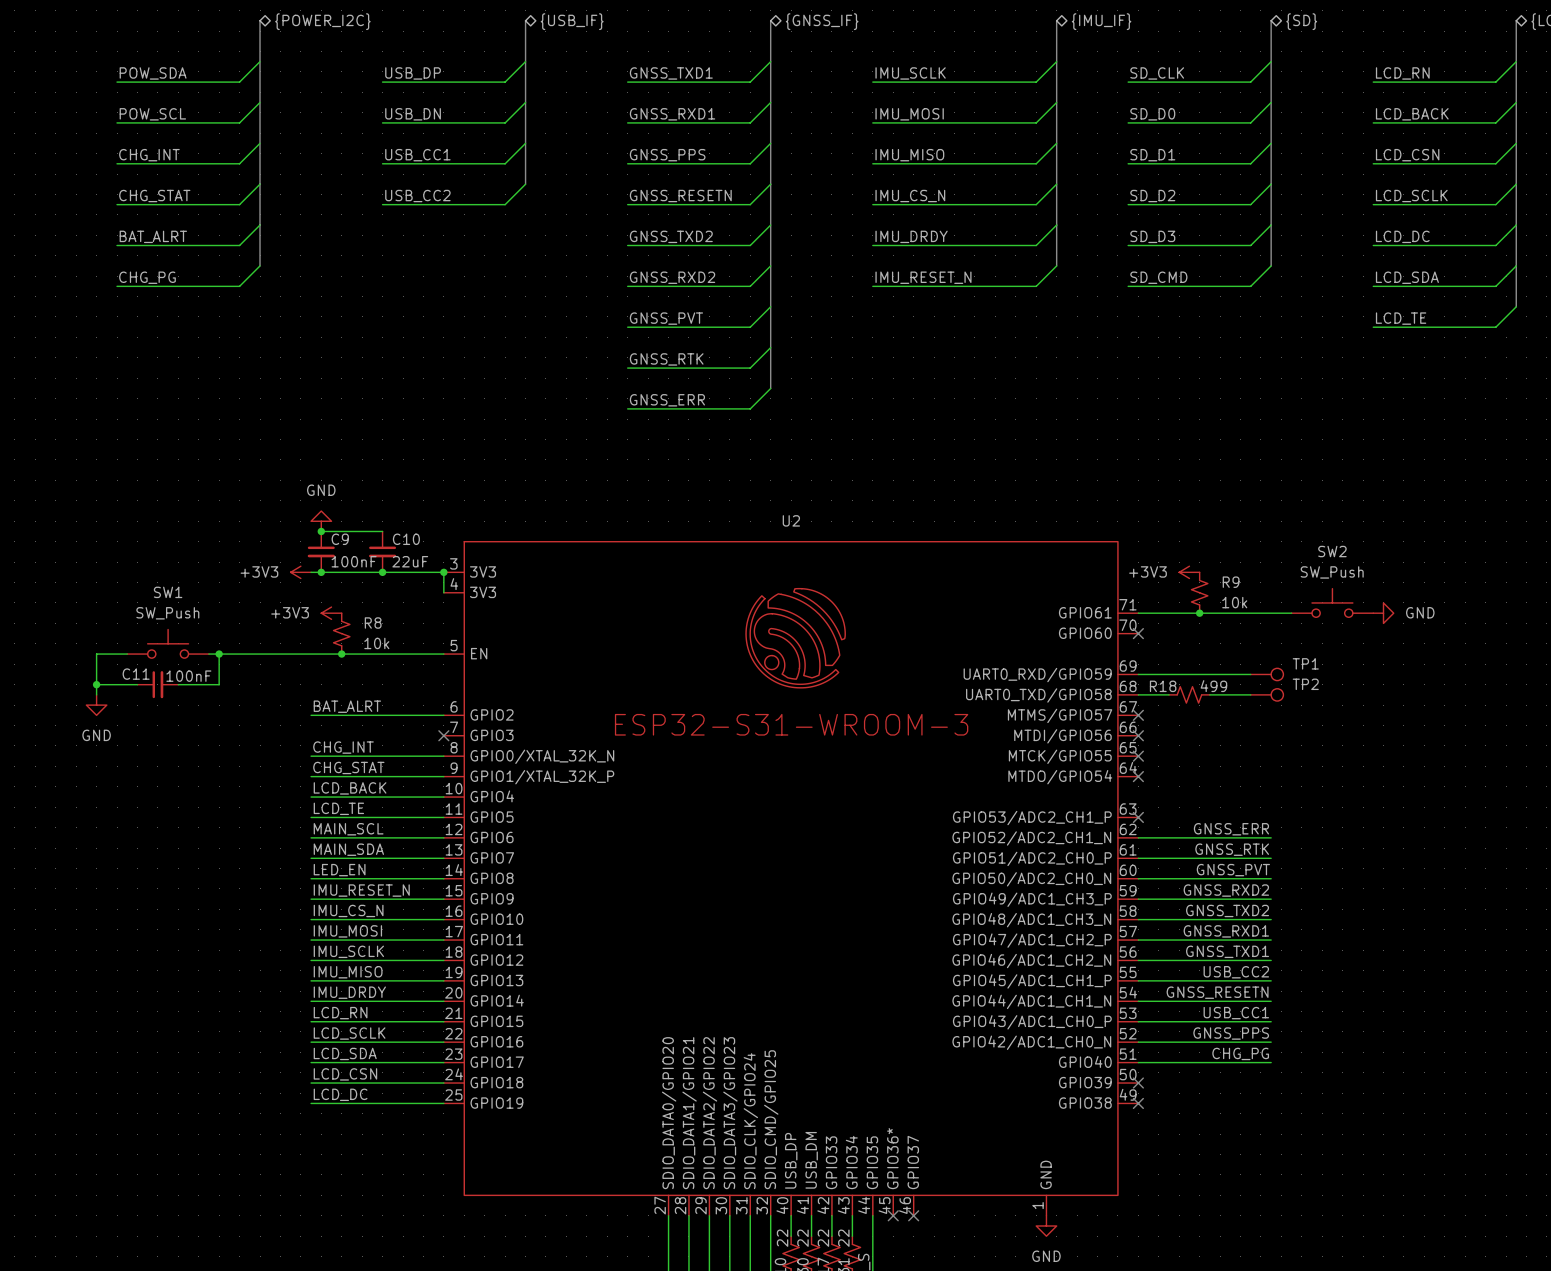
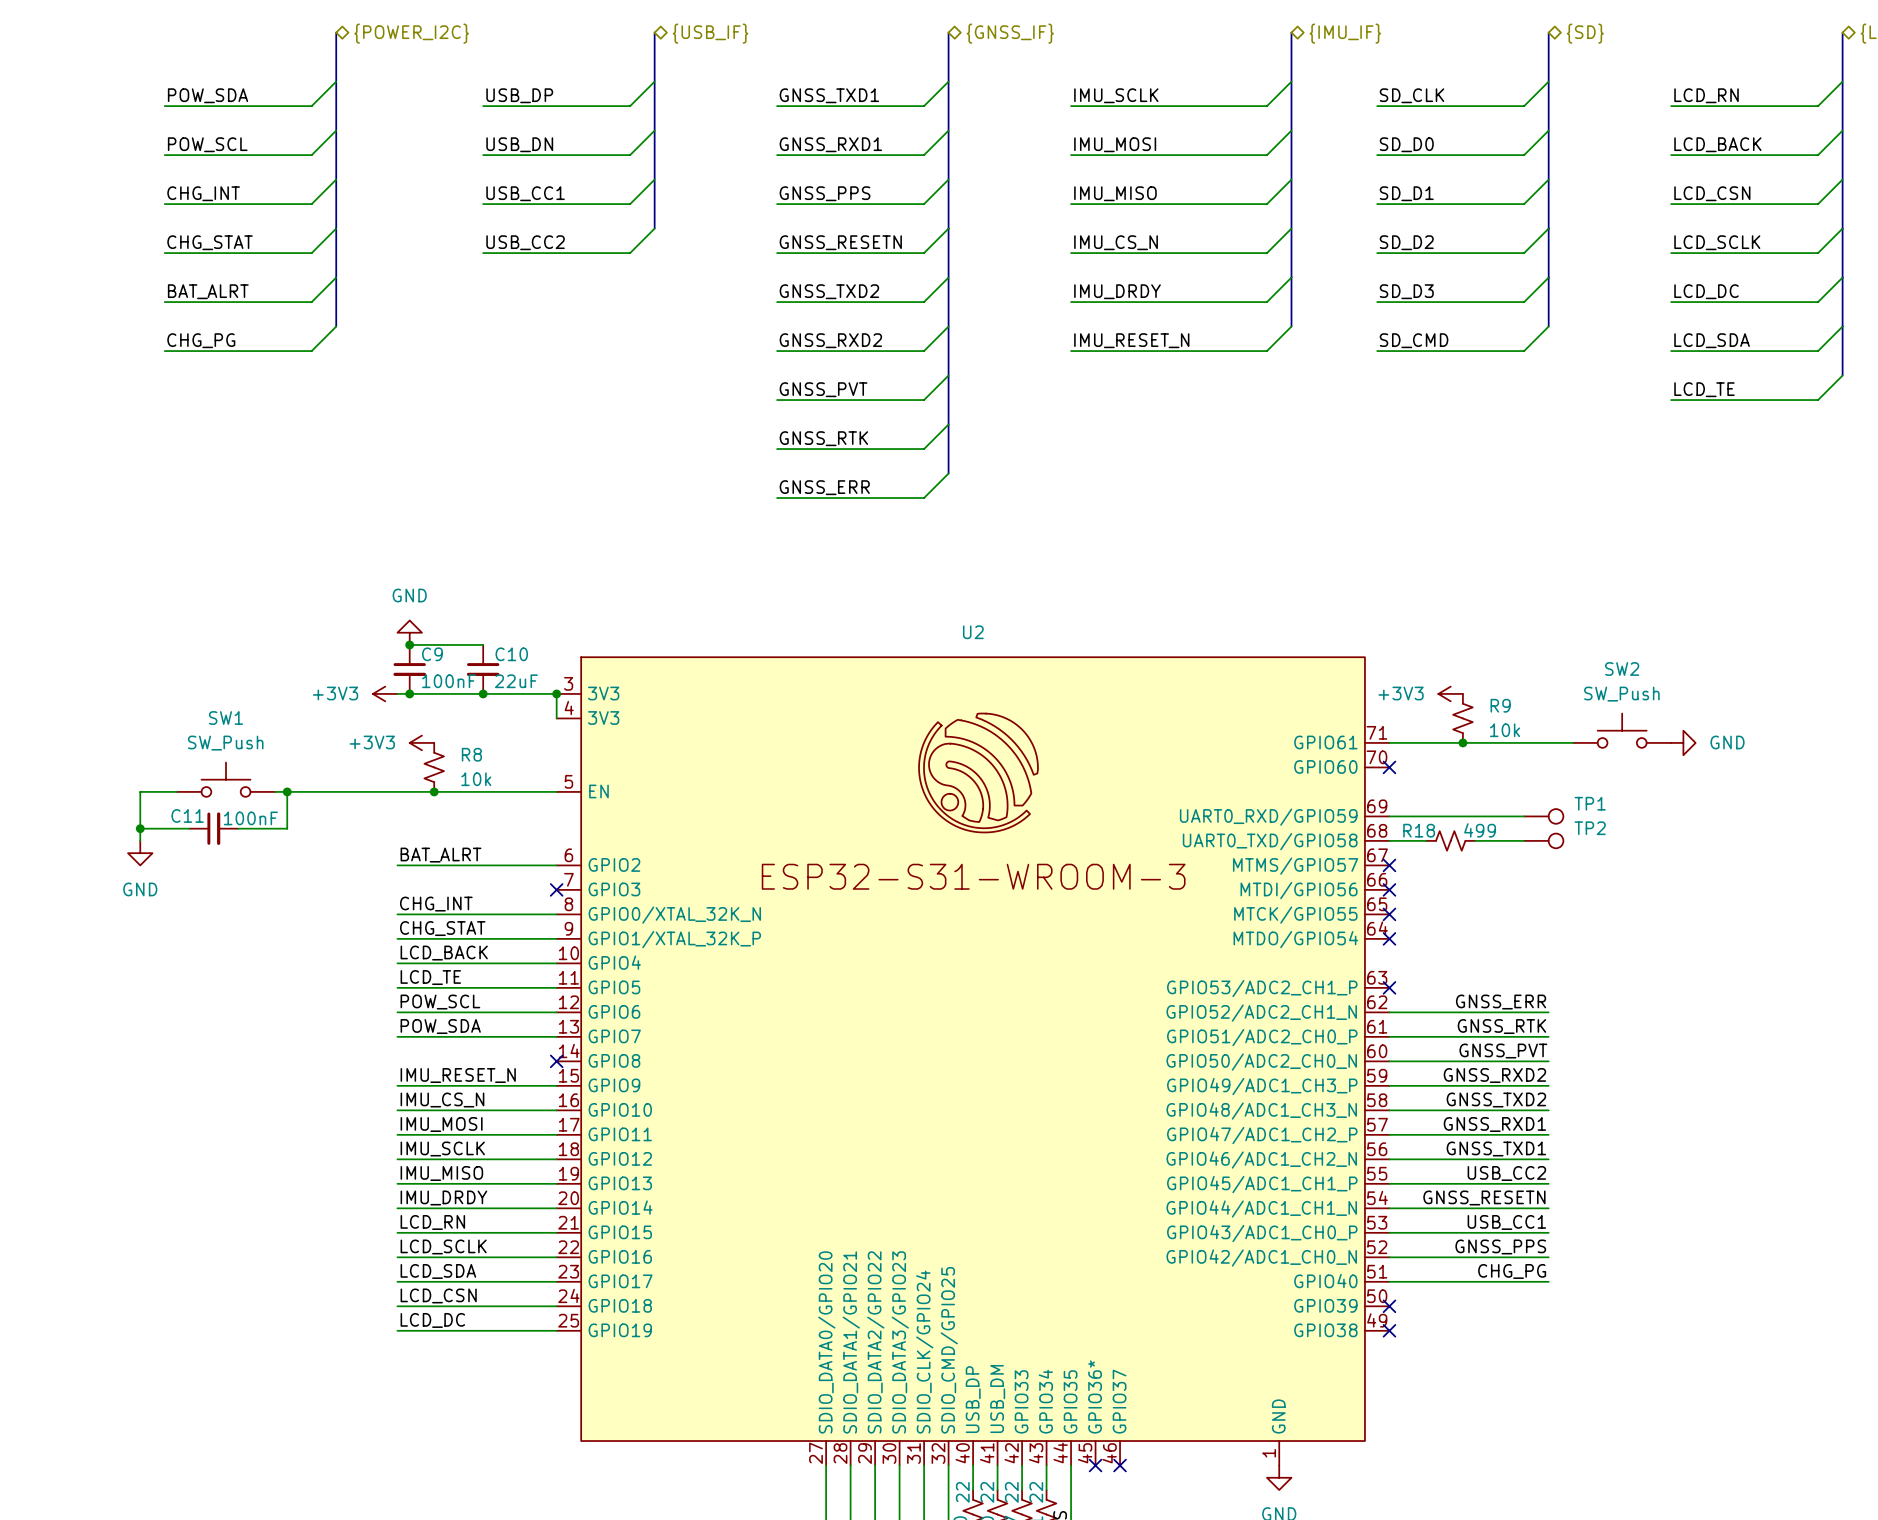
label: MAIN_SCL (348, 829) -> POW_SCL (440, 1002)
label: MAIN_SDA (348, 849) -> POW_SDA (440, 1026)
label: LED_EN (339, 870) -> none
wire: (311, 878) (443, 878) -> none
no-connect mark: none -> (556, 1061)

